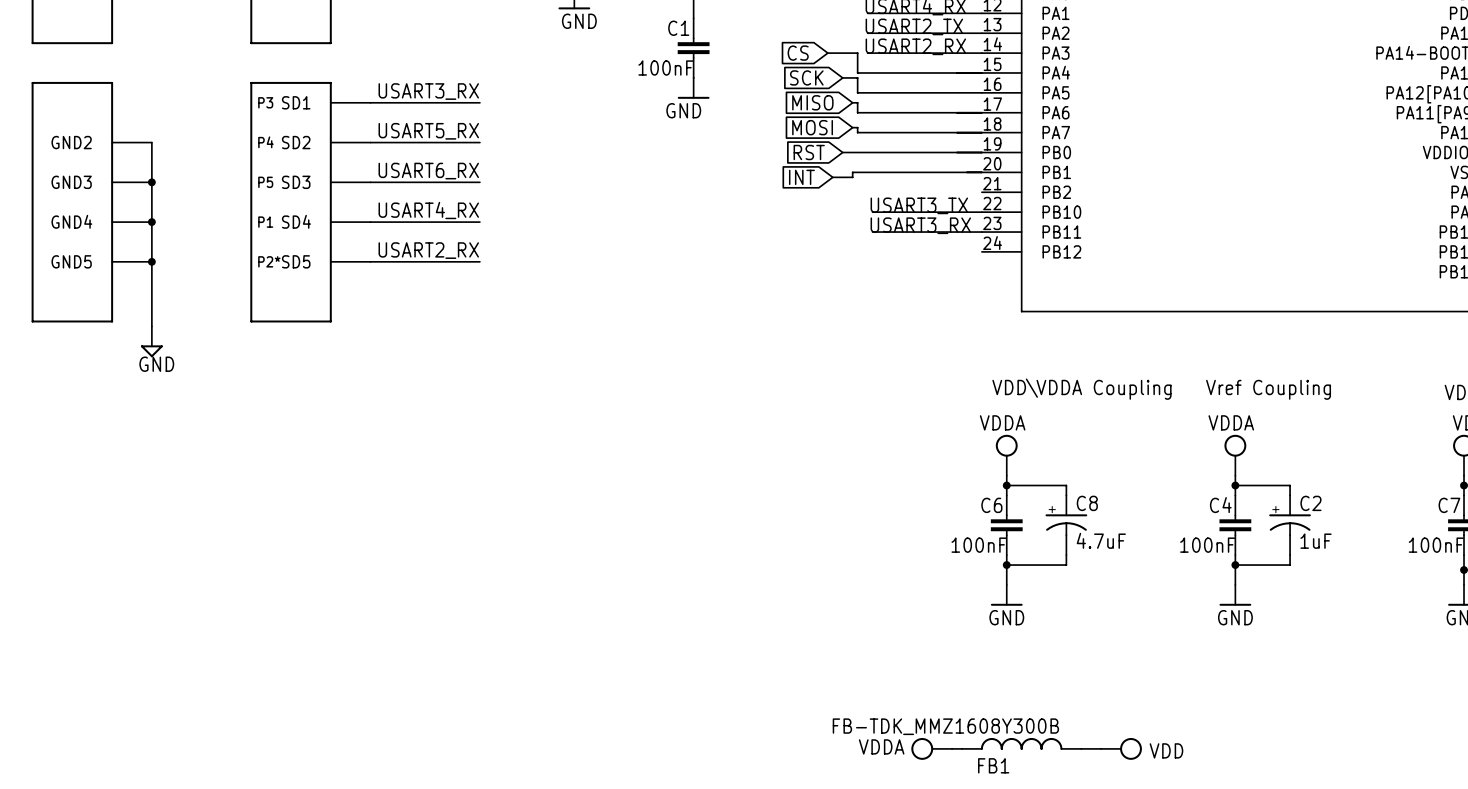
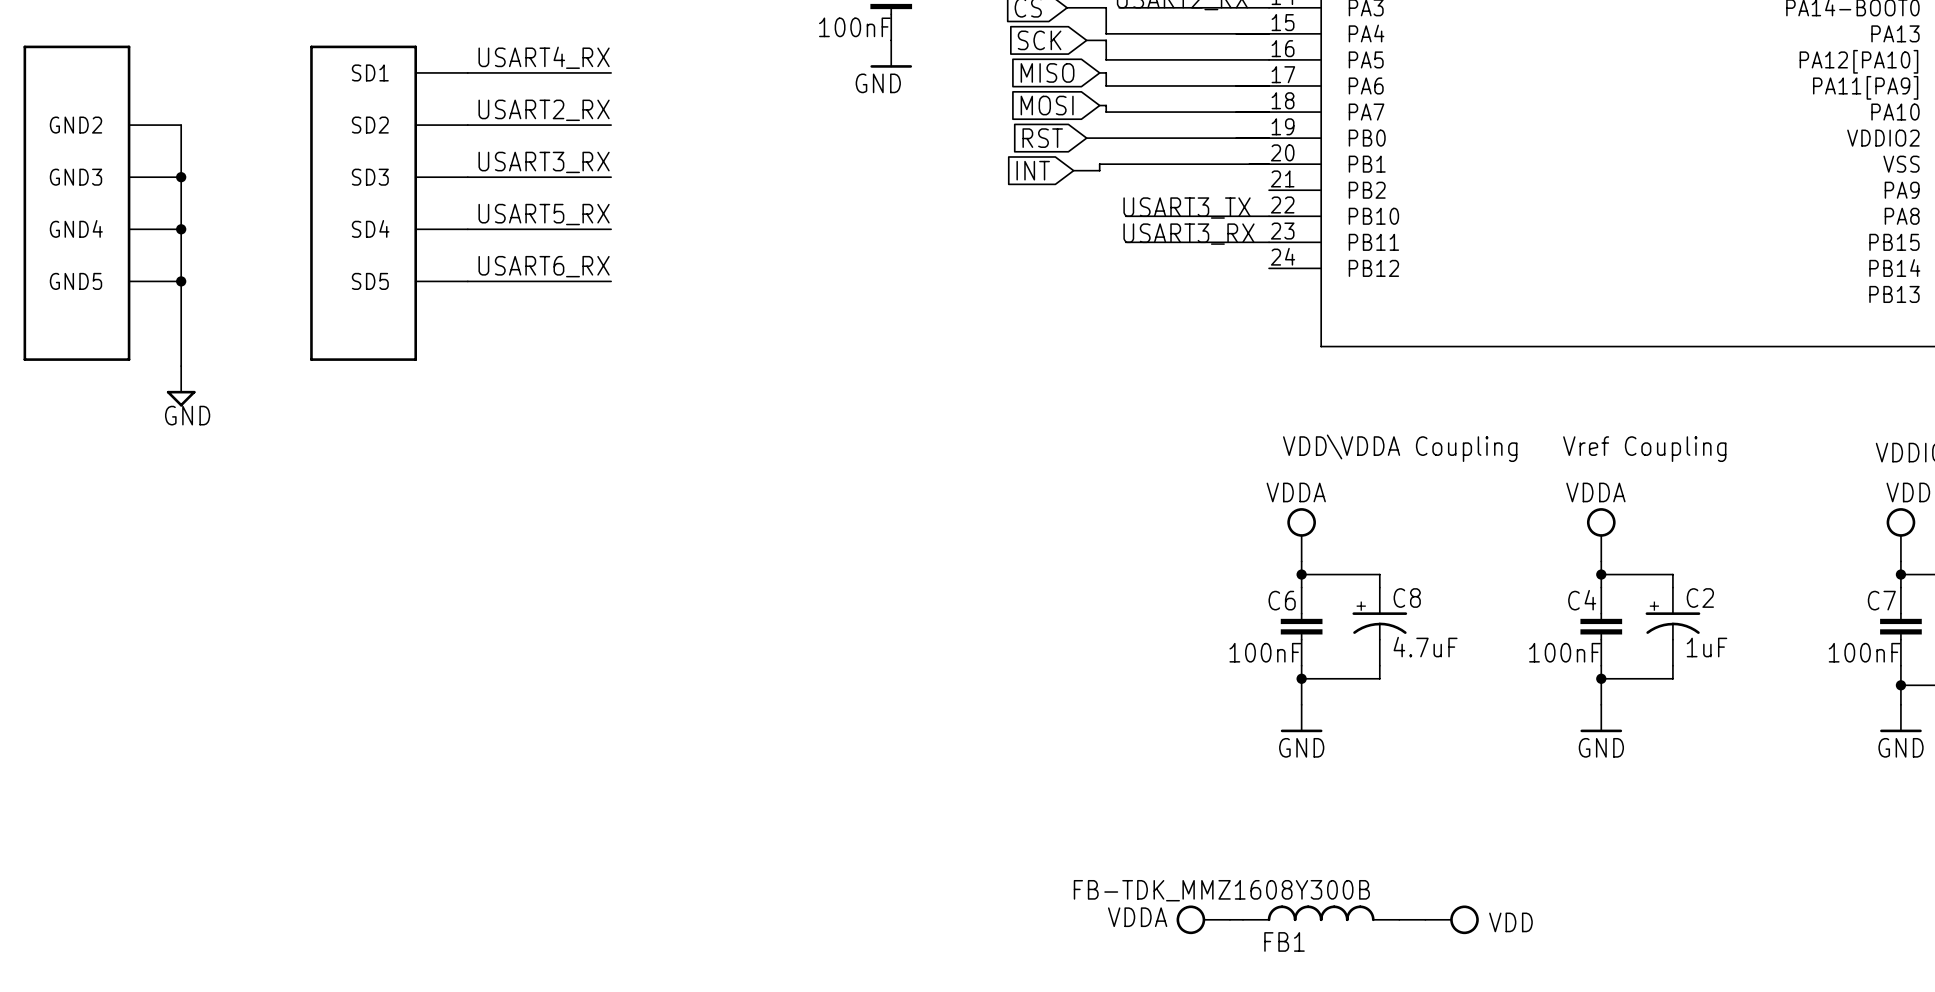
label: USART3_RX (428, 91) -> USART4_RX (544, 57)
text: P3 (265, 102) -> none
label: USART5_RX (428, 131) -> USART2_RX (544, 110)
text: P4 (265, 142) -> none
label: USART6_RX (428, 171) -> USART3_RX (544, 162)
text: P5 (265, 182) -> none
label: USART4_RX (428, 210) -> USART5_RX (544, 214)
text: P1 (265, 222) -> none
label: USART2_RX (428, 250) -> USART6_RX (544, 266)
text: P2* (269, 261) -> none

